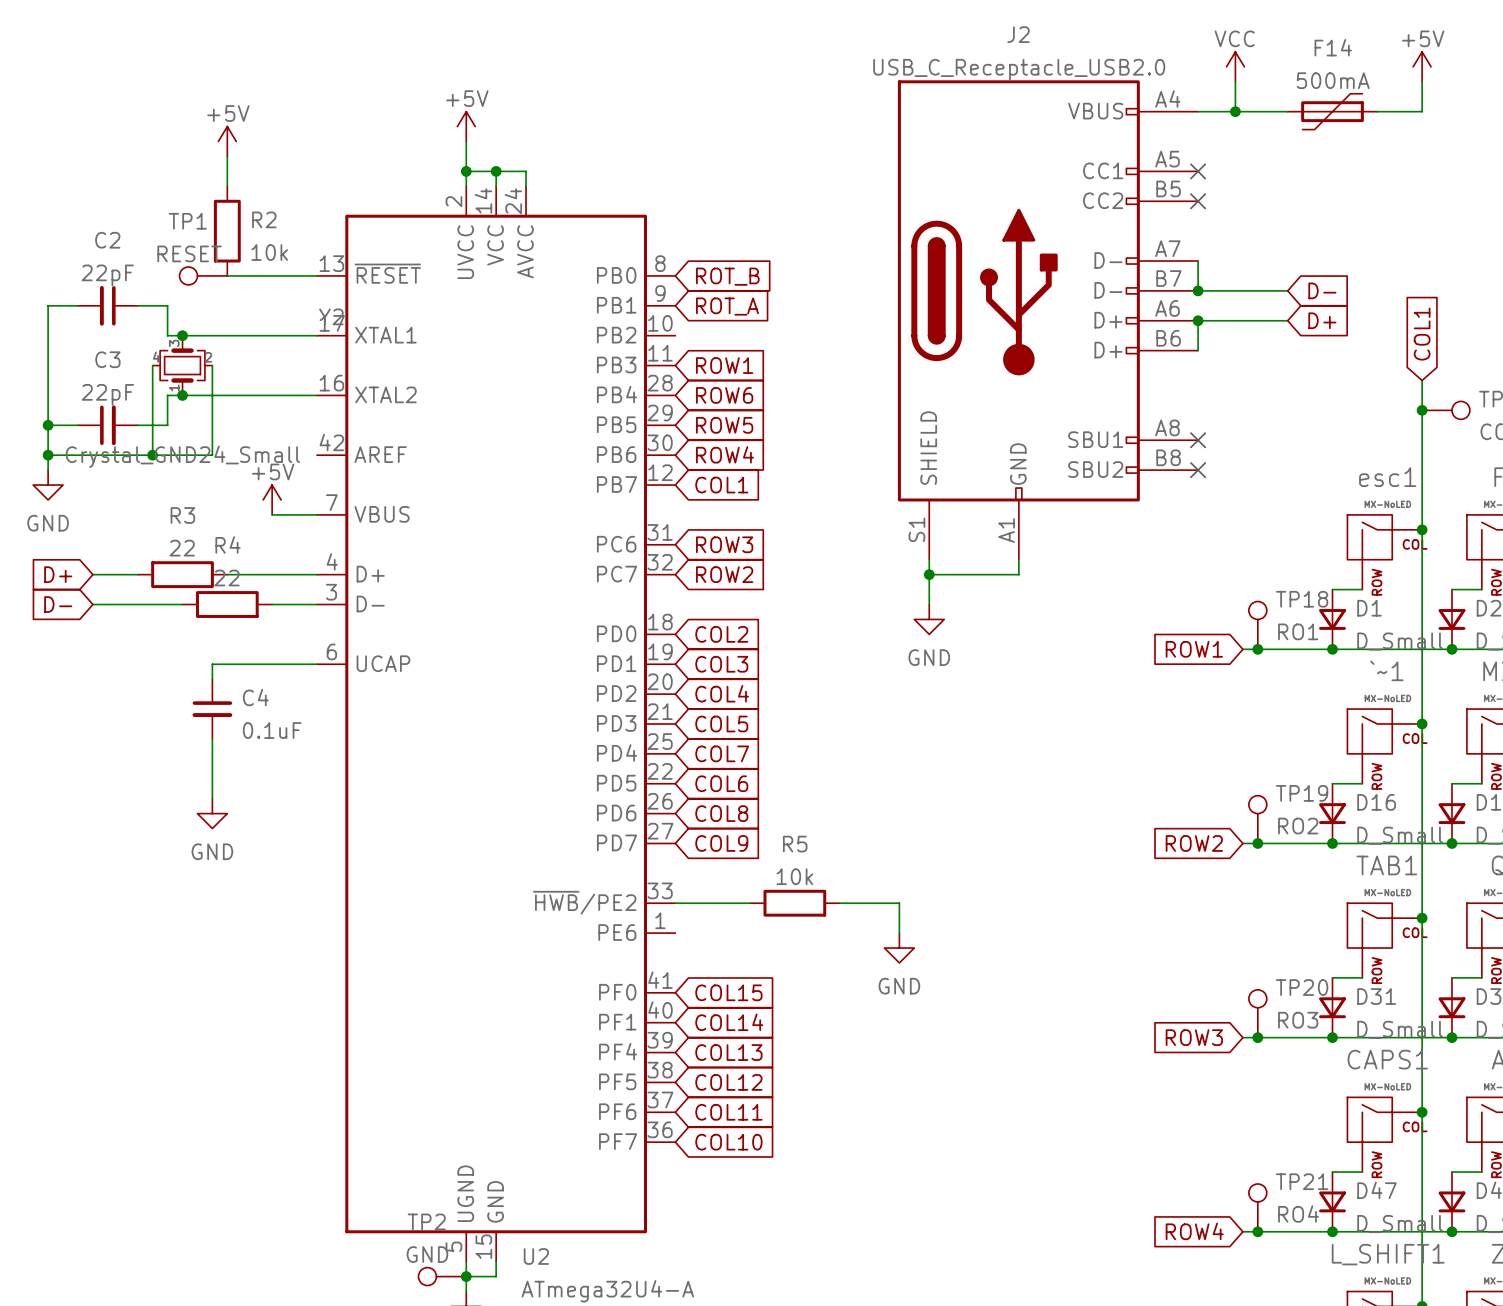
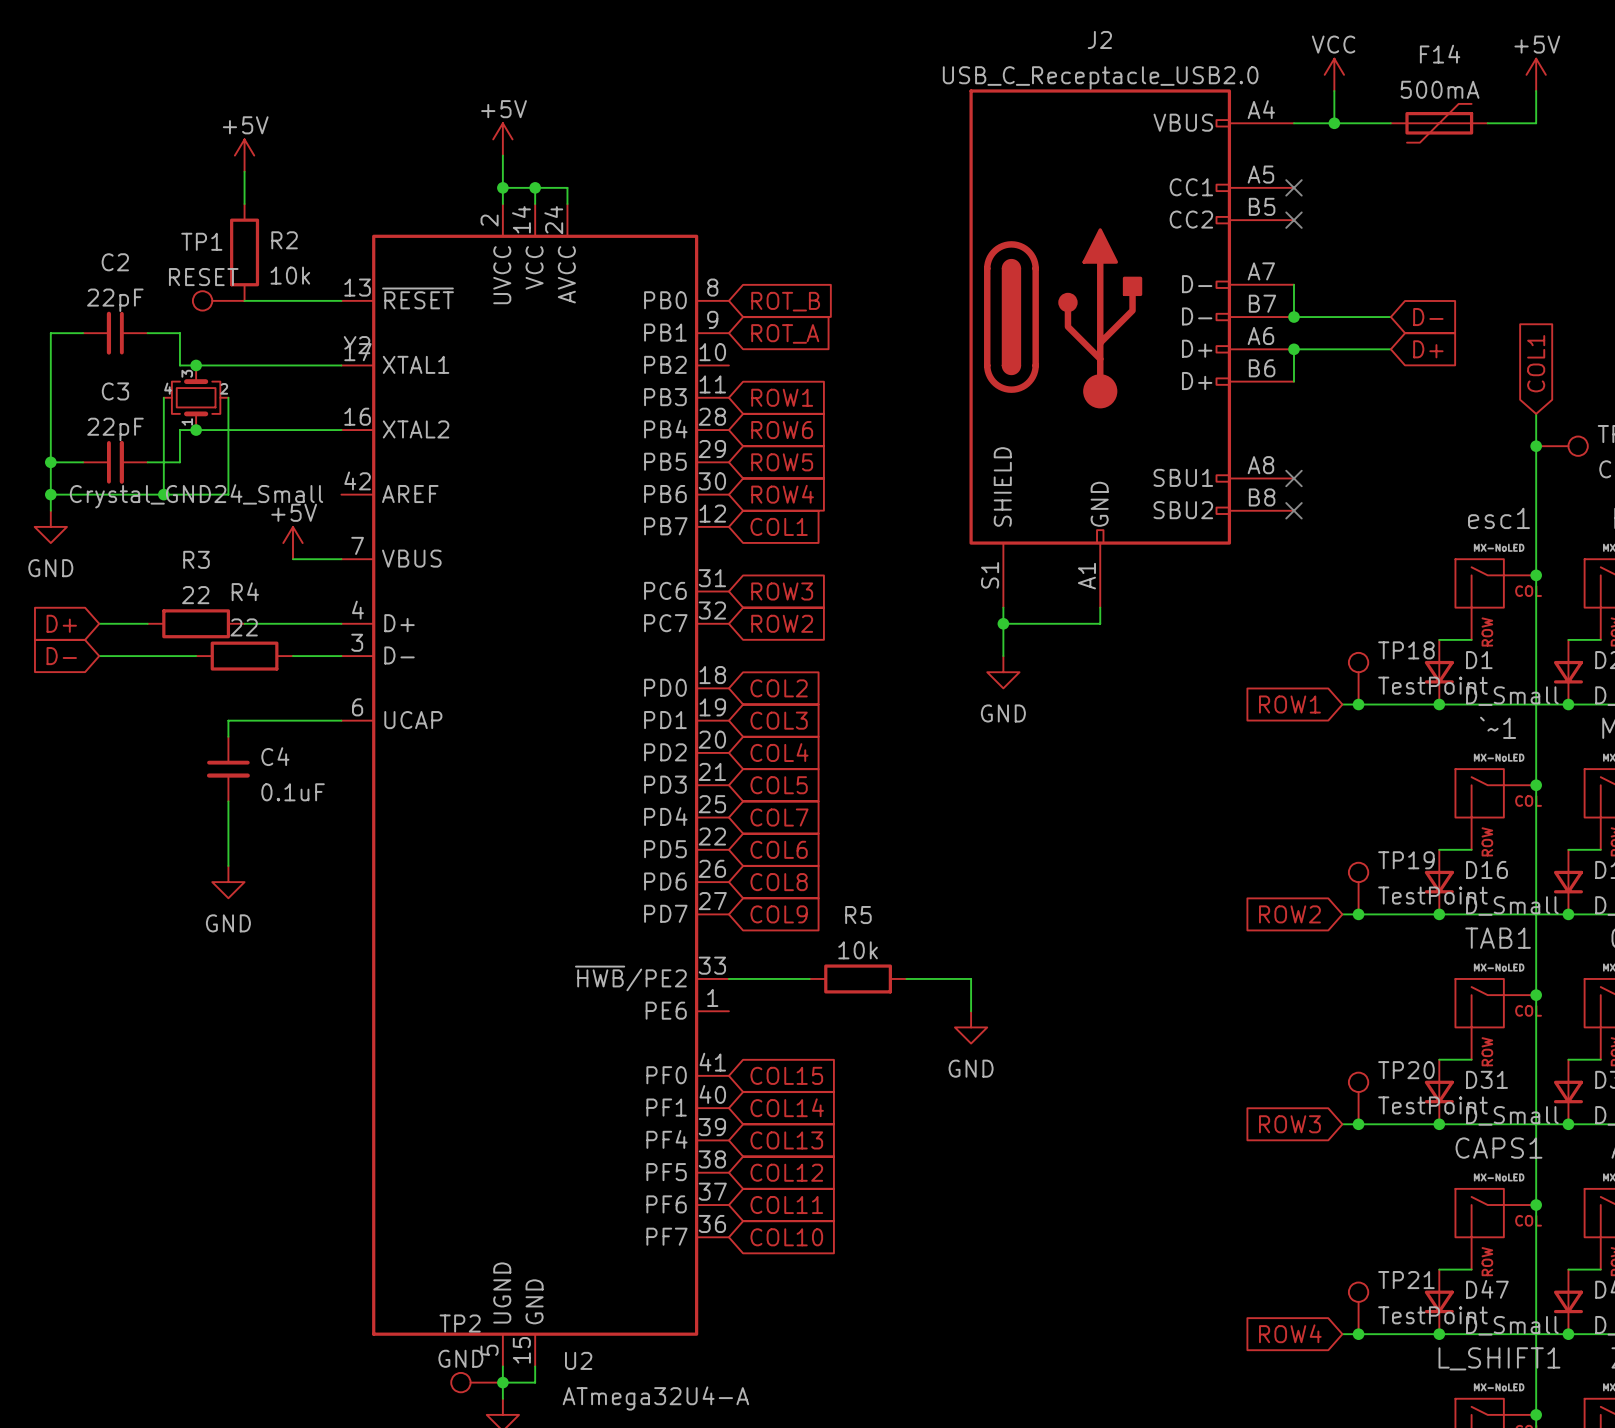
TP18 value: RO1 (1298, 631) -> TestPoint (1432, 685)
TP19 value: RO2 (1298, 826) -> TestPoint (1432, 895)
TP20 value: RO3 (1298, 1020) -> TestPoint (1432, 1105)
TP21 value: RO4 (1298, 1213) -> TestPoint (1432, 1315)

